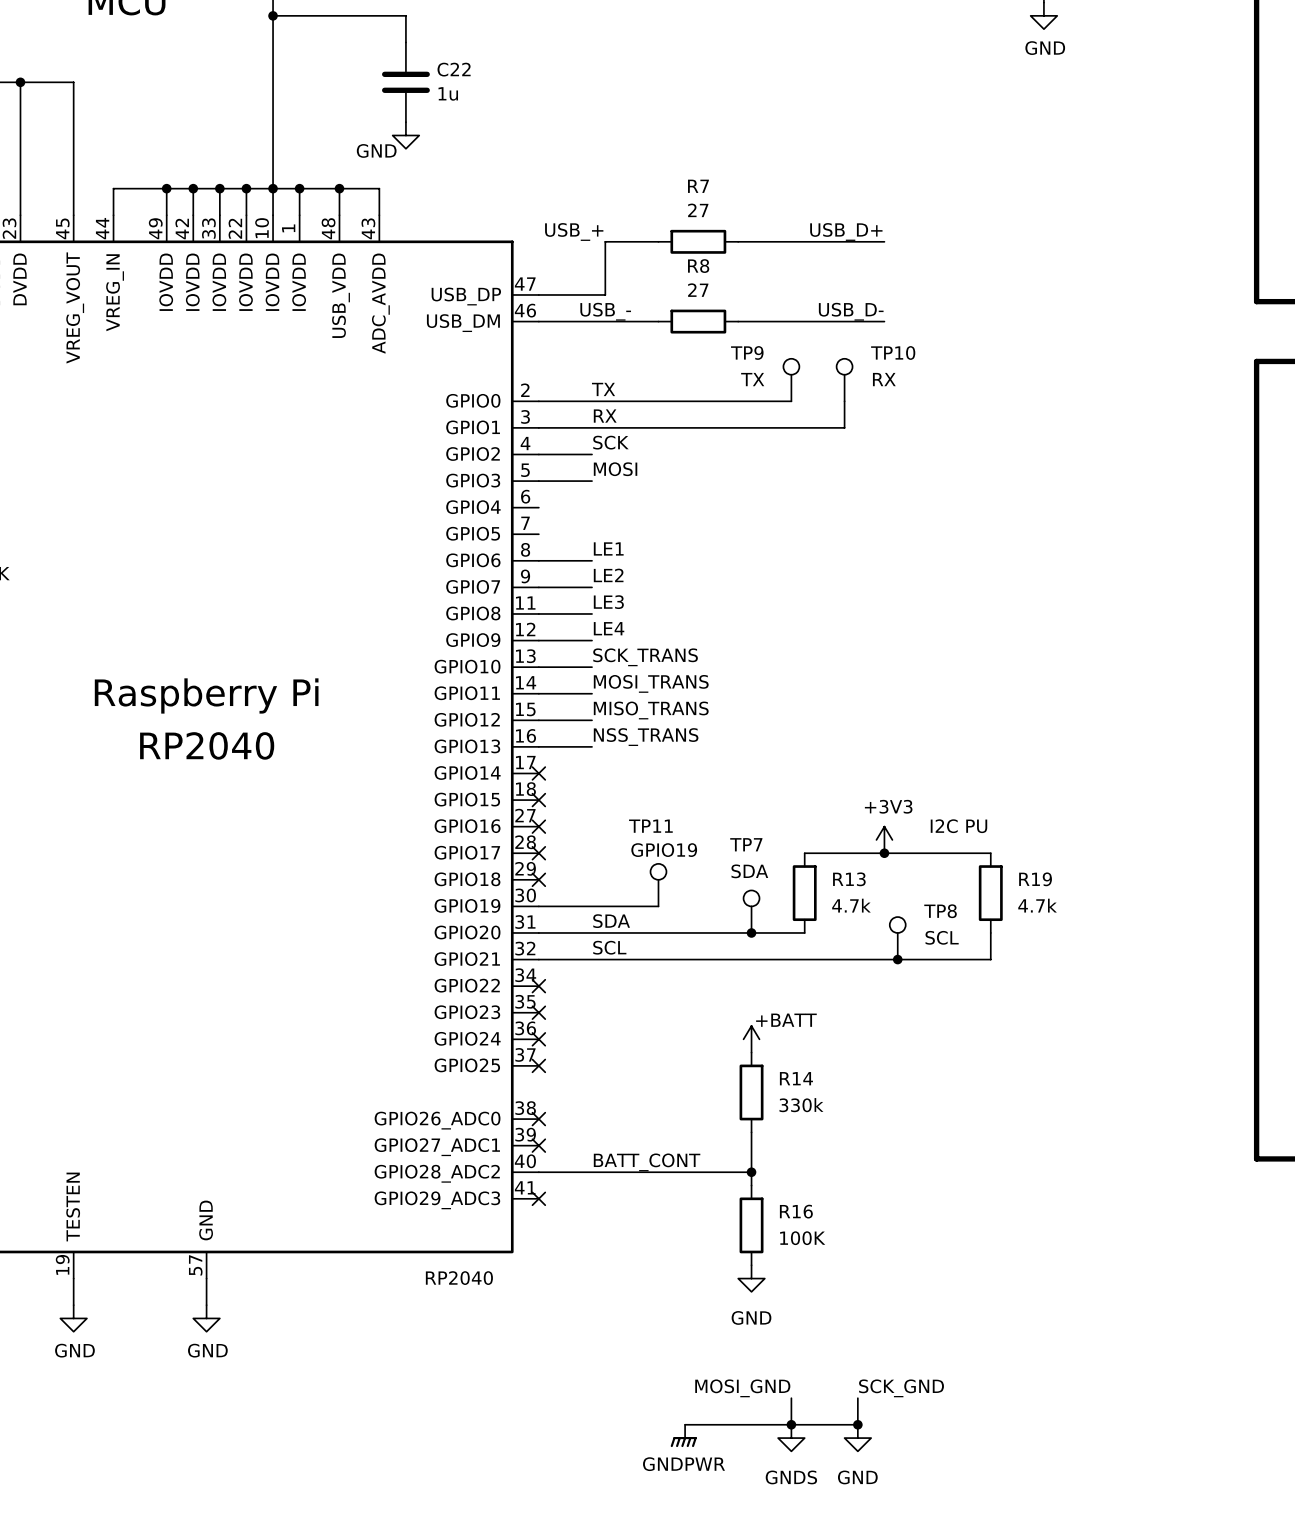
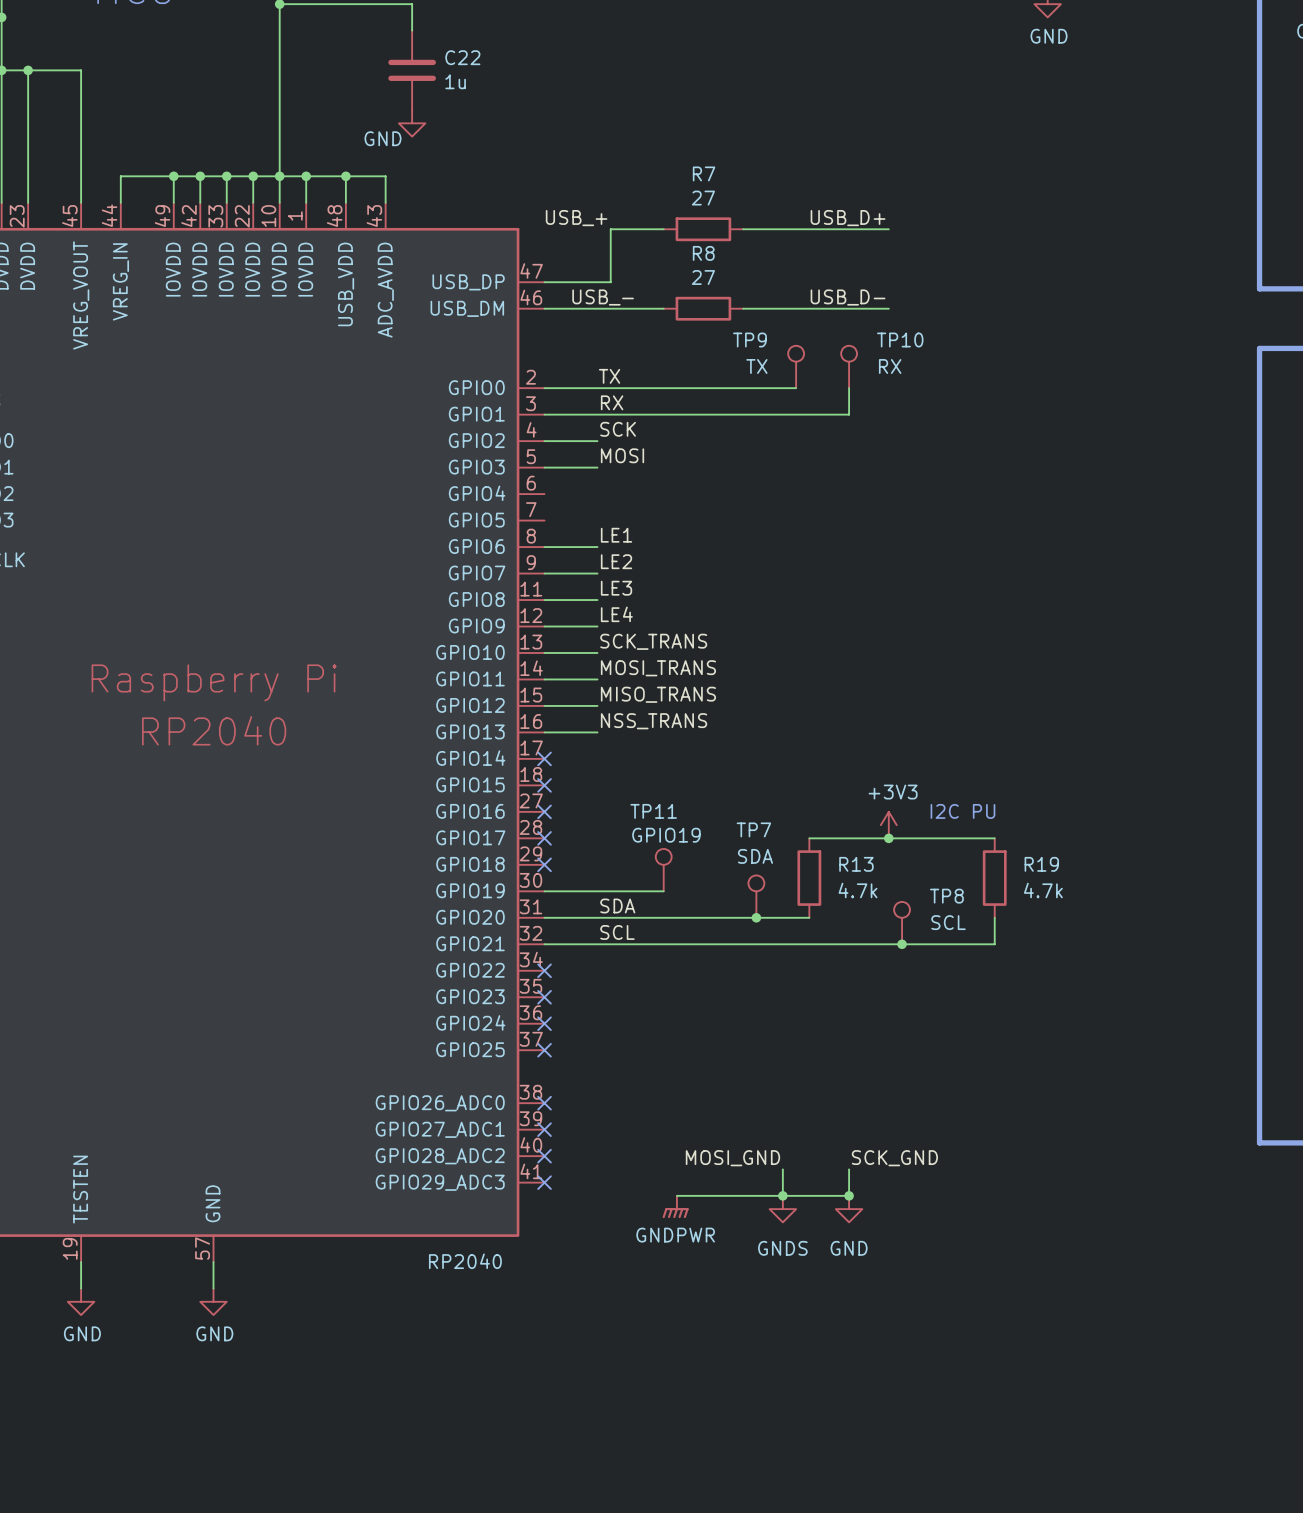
power symbol: +BATT (751, 1039) -> none
R14: 330k (751, 1092) -> none
wire: (751, 1132) (751, 1185) -> none
label: BATT_CONT (647, 1162) -> none
wire: (538, 1172) (751, 1172) -> none
no-connect mark: none -> (544, 1156)
junction position: (751, 1172) -> (782, 1195)
junction: none -> (849, 1195)
R16: 100K (751, 1225) -> none
power symbol: none -> GND (849, 1209)
power symbol: GND (751, 1278) -> none
label position: MOSI_GND (742, 1388) -> MOSI_GND (732, 1158)
label position: SCK_GND (901, 1388) -> SCK_GND (894, 1158)
wire: (791, 1398) (791, 1424) -> (782, 1169) (782, 1195)
wire: (857, 1398) (857, 1424) (685, 1424) -> (849, 1169) (849, 1195) (676, 1195)
junction: (791, 1424) -> none
junction: (857, 1424) -> none
power symbol position: GNDPWR (683, 1435) -> GNDPWR (675, 1206)
power symbol position: GNDS (791, 1438) -> GNDS (782, 1209)
power symbol: GND (857, 1438) -> none

